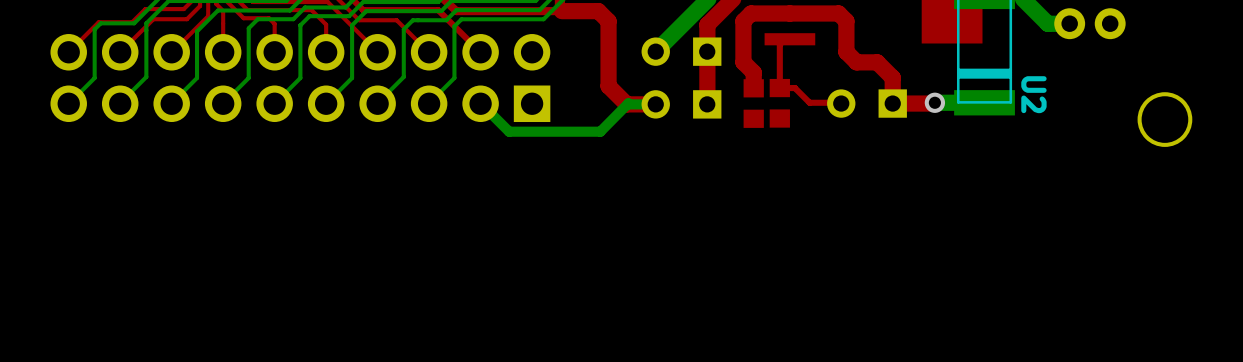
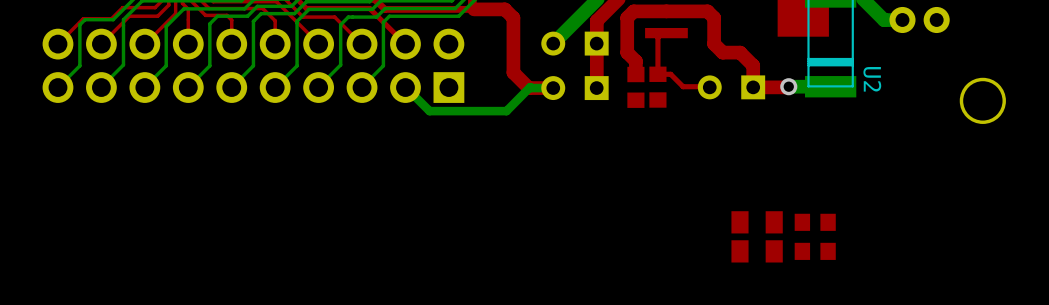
part: none -> (757, 222)
part: none -> (815, 222)
part: none -> (757, 251)
part: none -> (815, 251)

